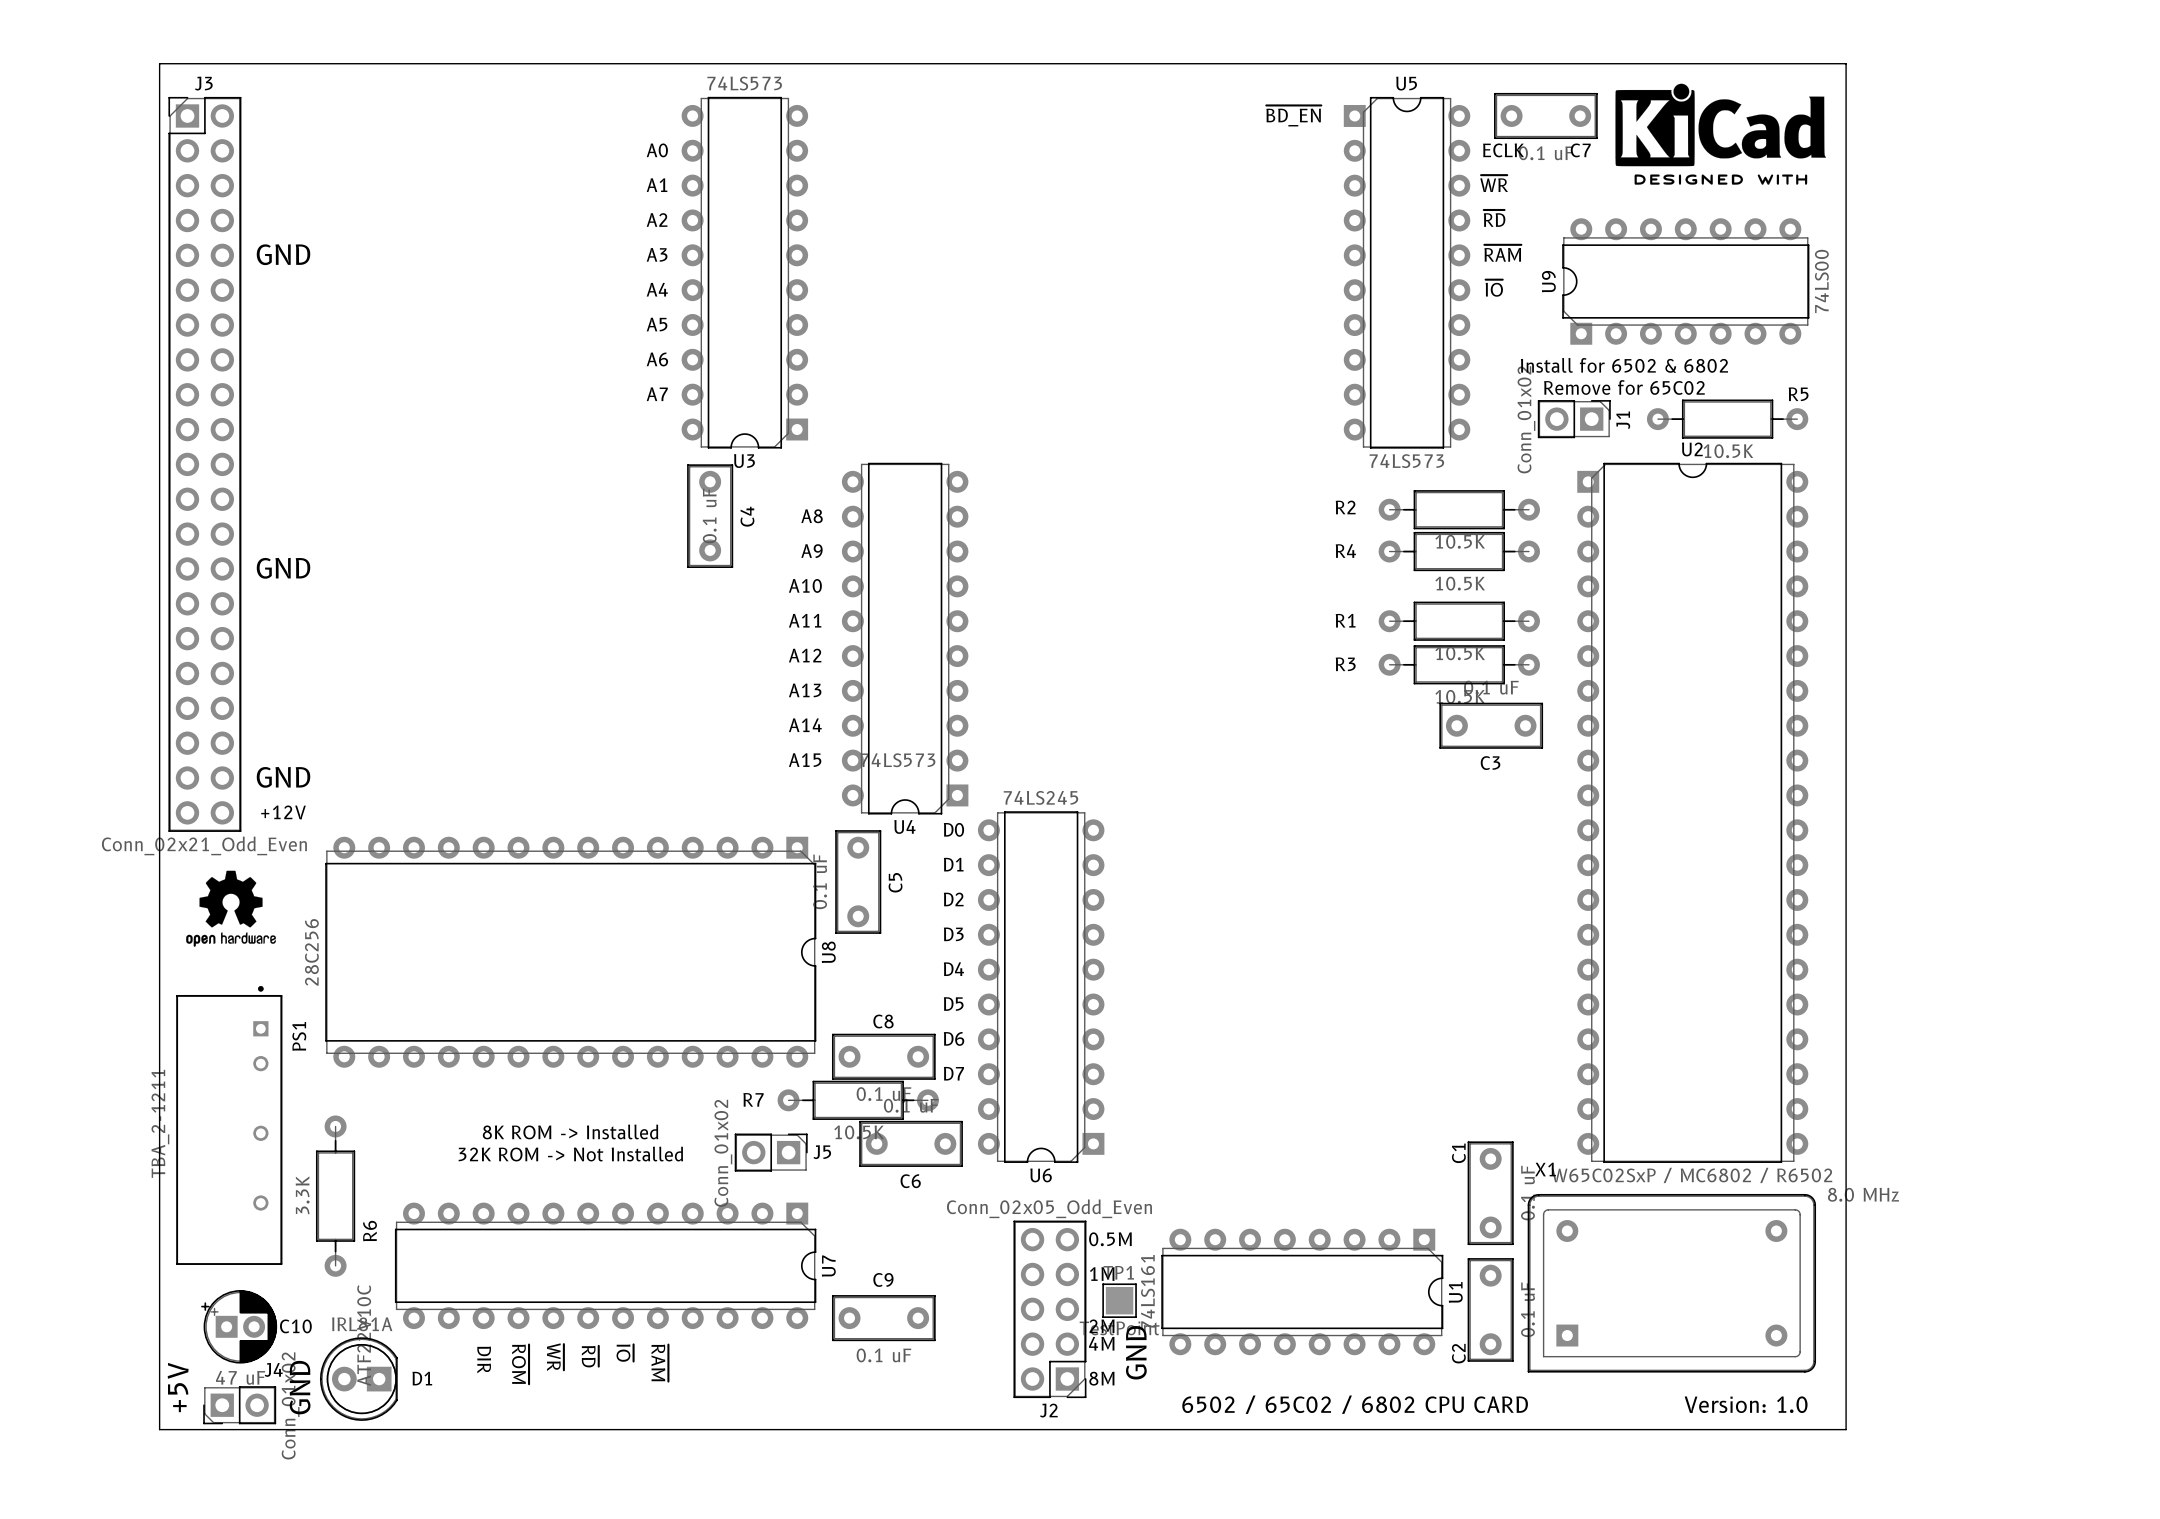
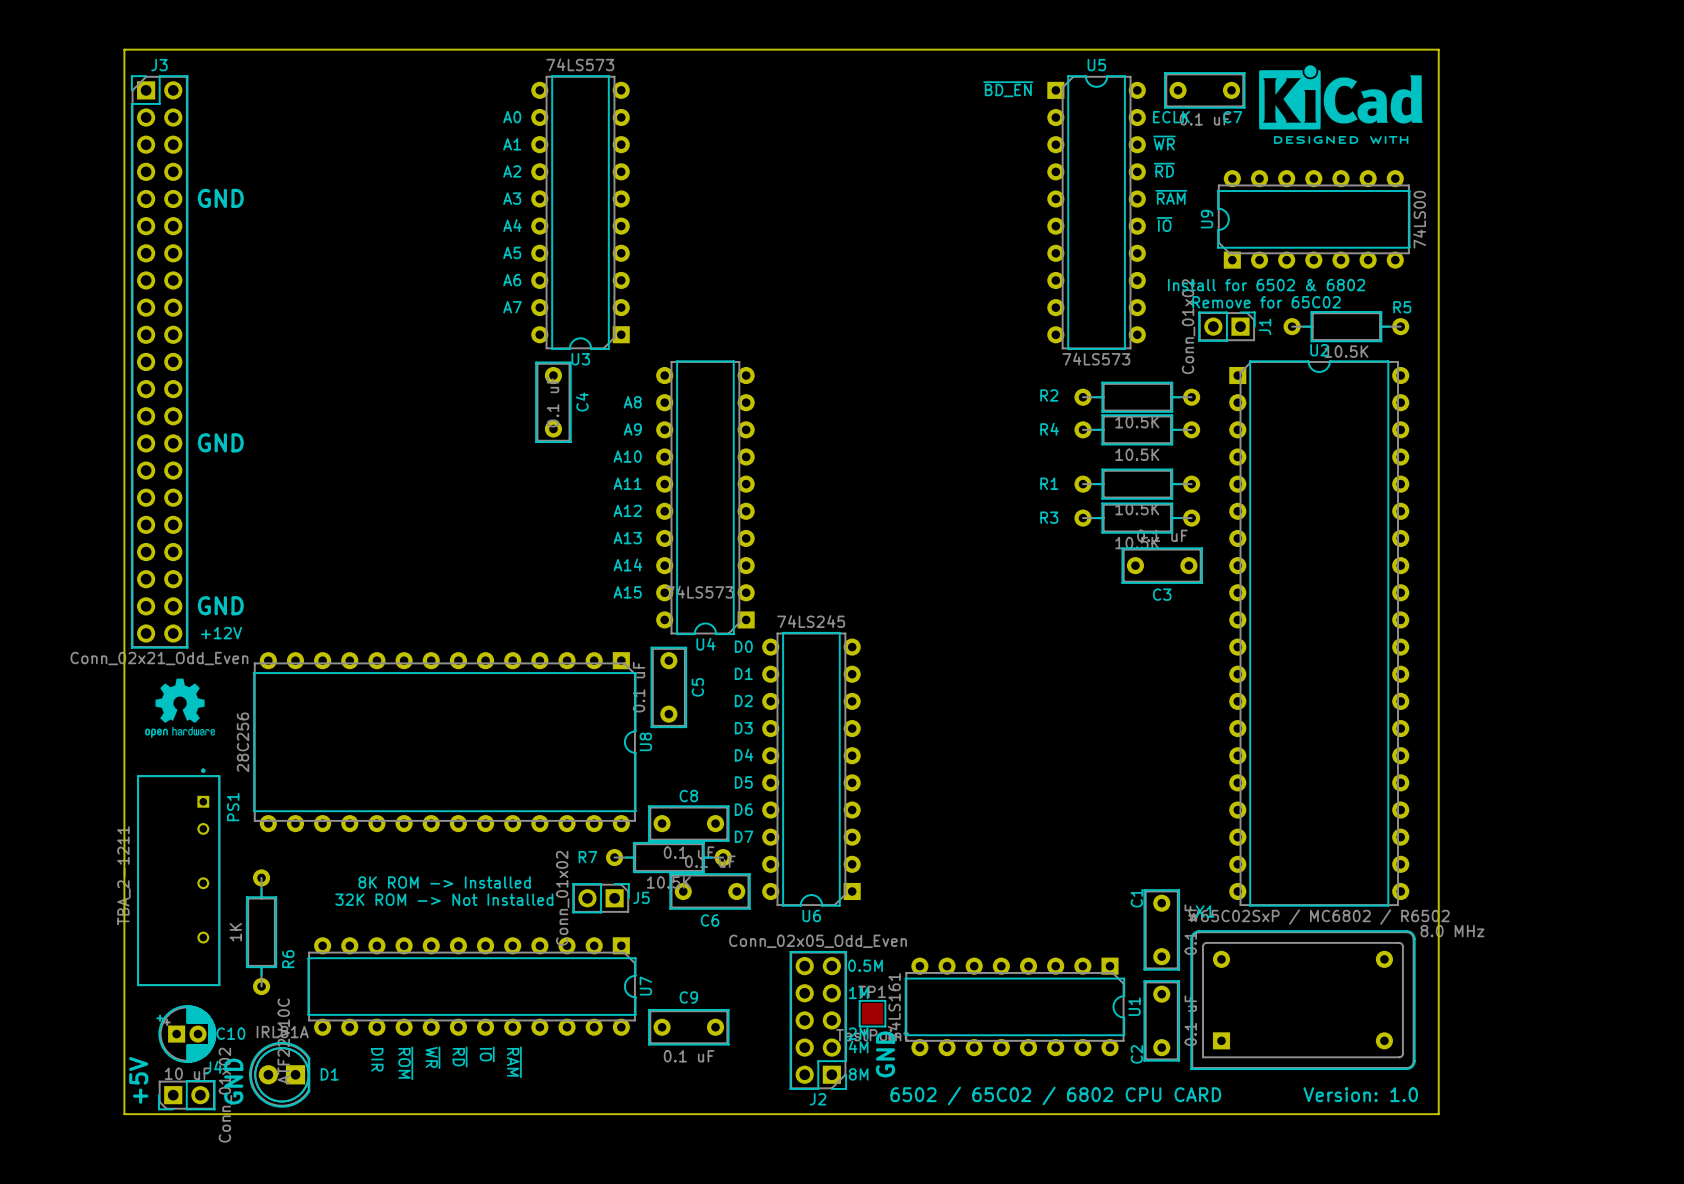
R6 value: 3.3K (302, 1195) -> 1K (235, 932)
C10 value: 47 uF (240, 1377) -> 10 uF (187, 1073)

